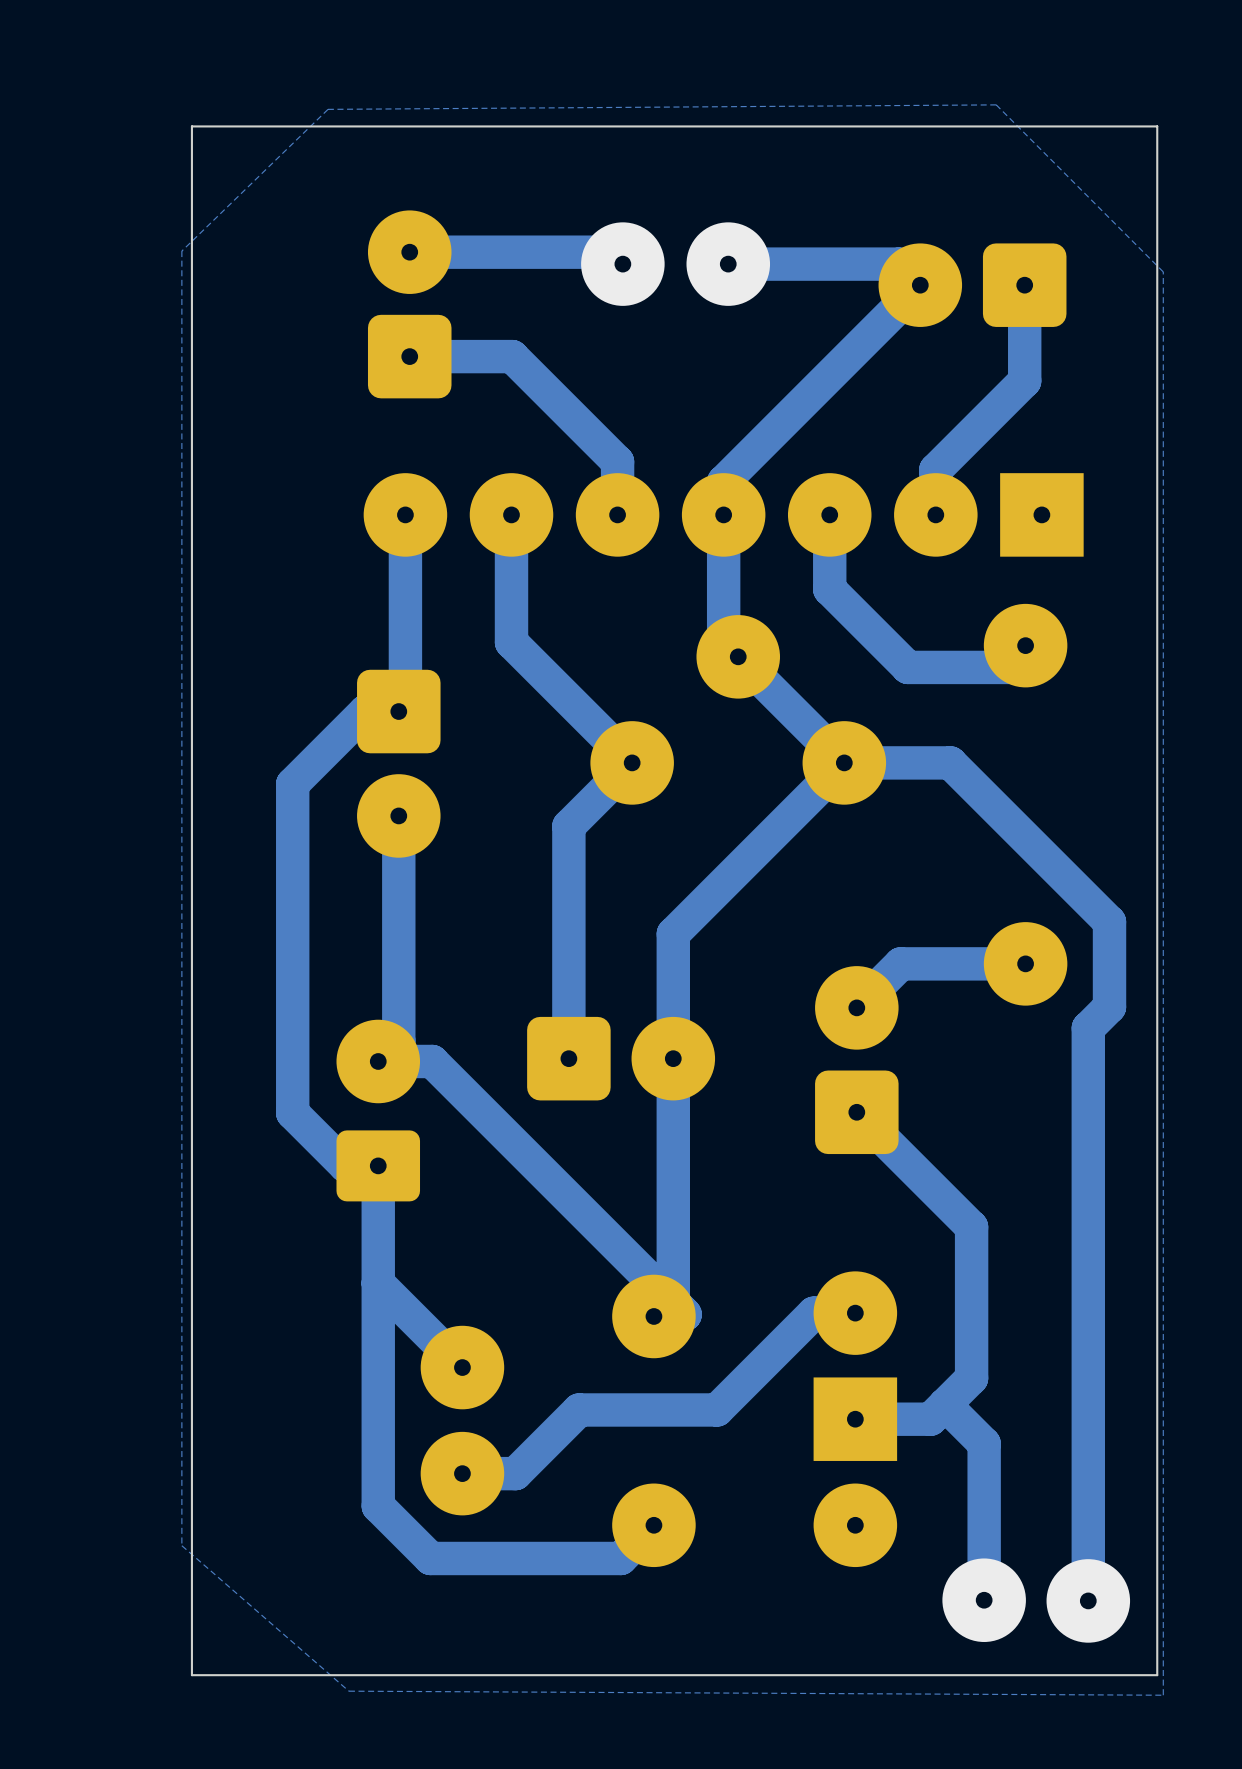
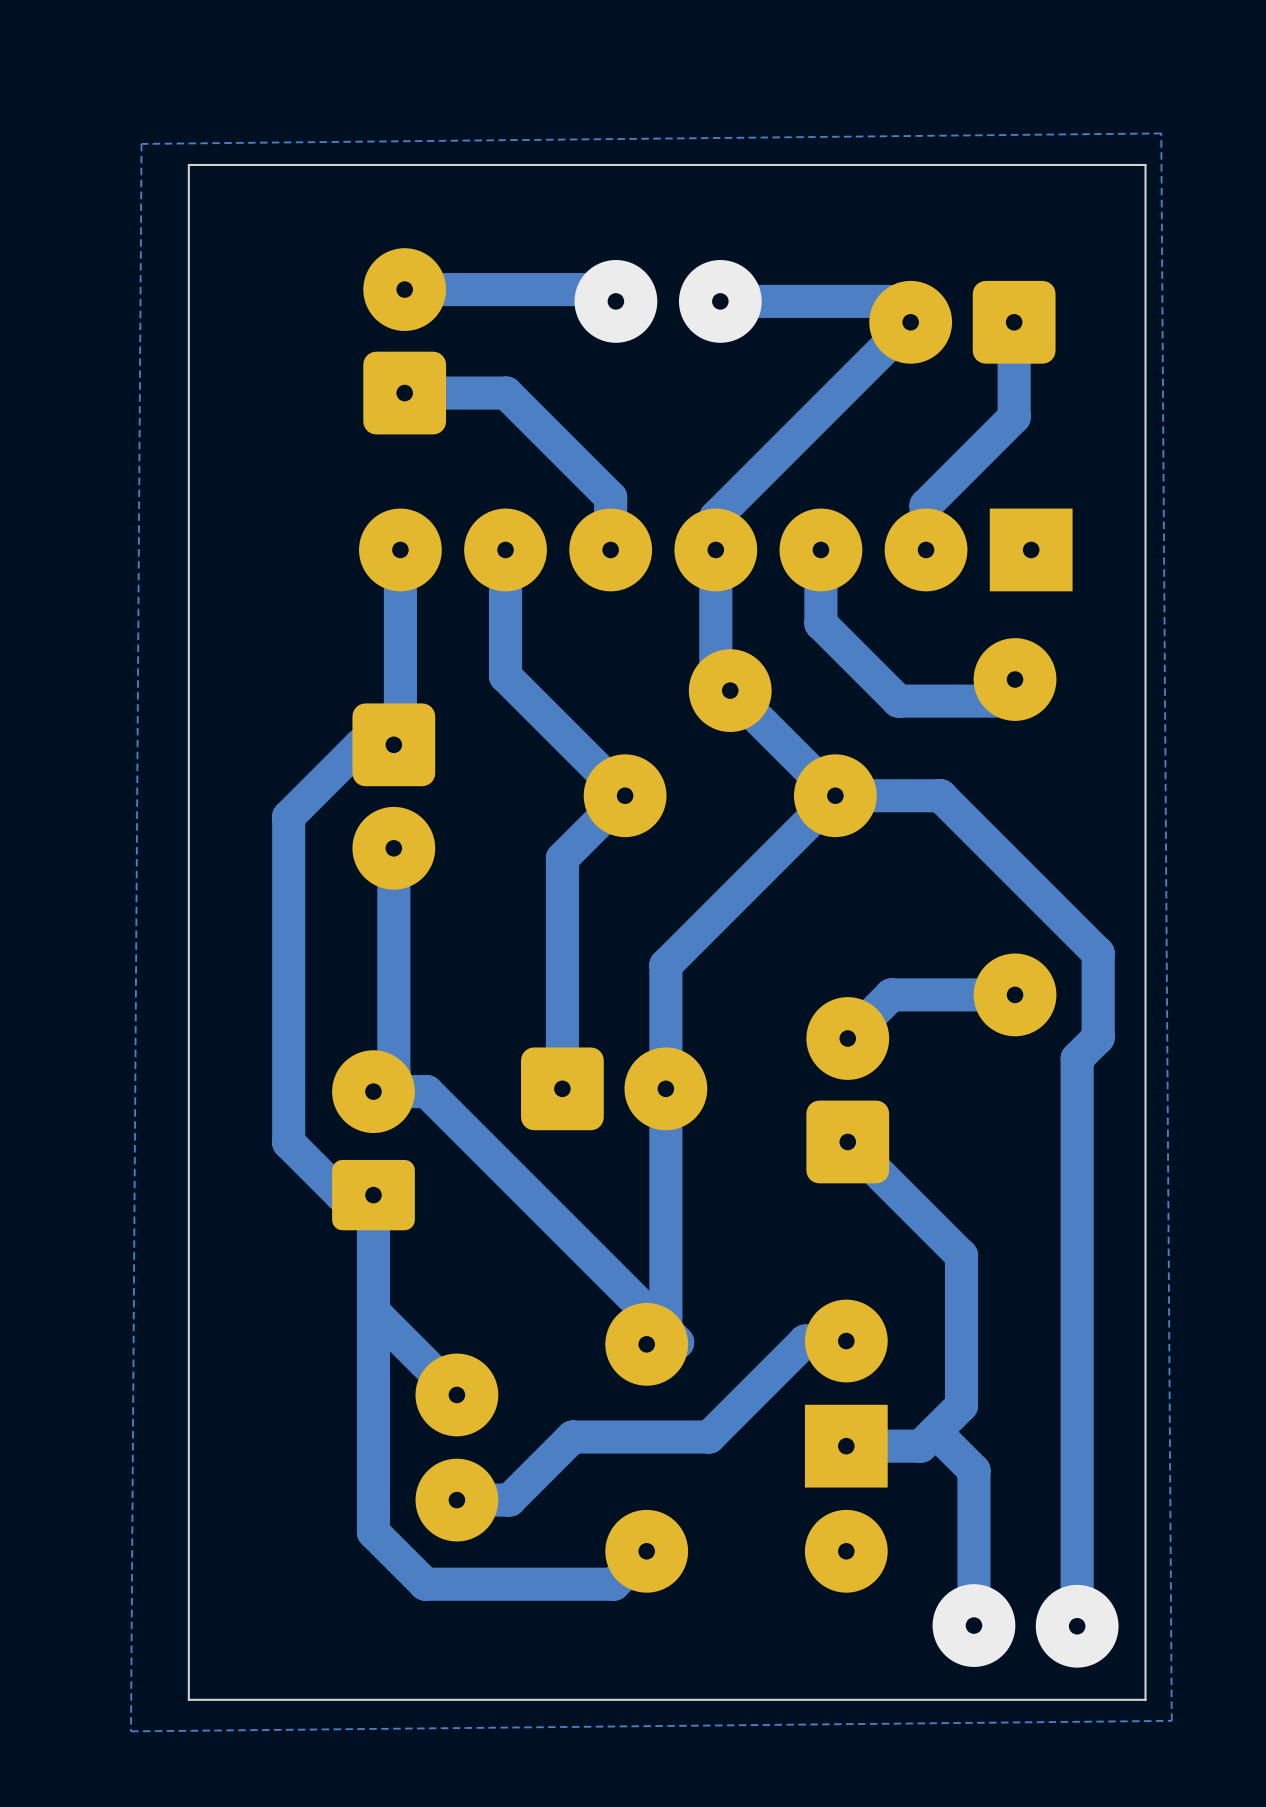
bottom zone outline: (996, 104) (1163, 271) (1163, 1695) (348, 1691) (181, 1545) (181, 251) (328, 109) (996, 104) -> (1161, 133) (1171, 1720) (131, 1731) (141, 143) (1161, 133)

